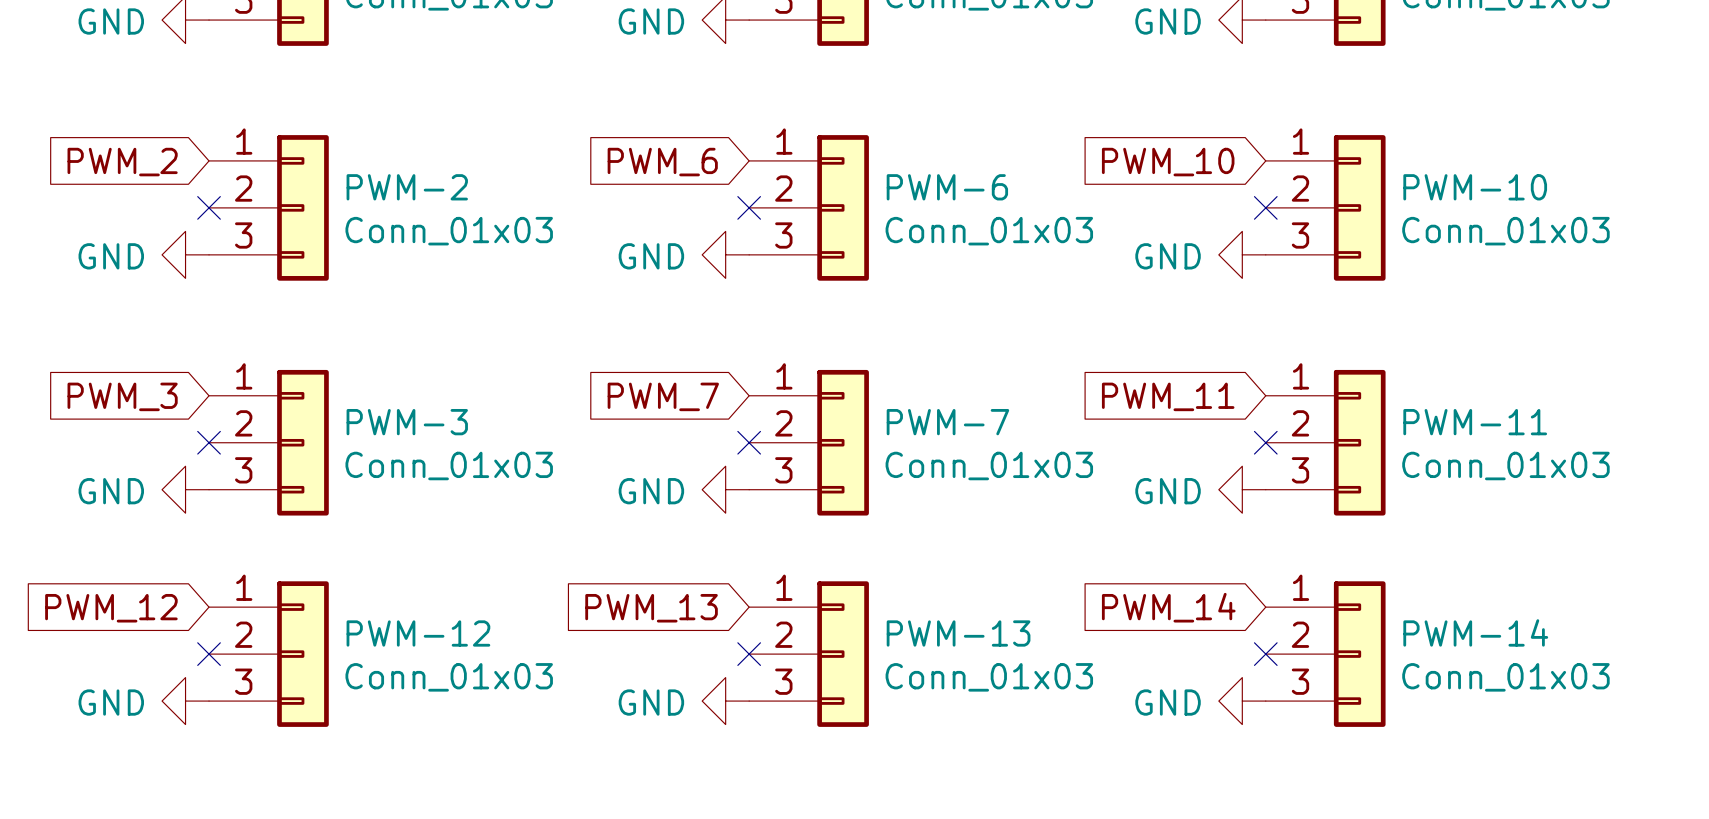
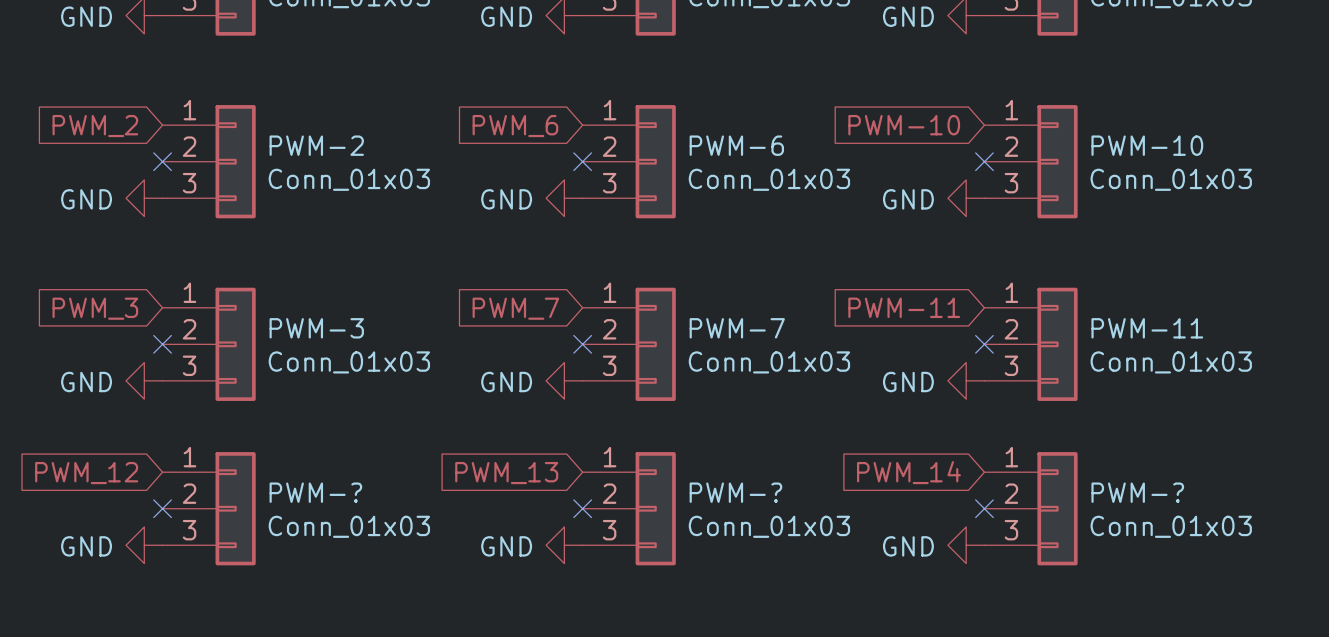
global label: PWM_10 (1168, 162) -> PWM-10 (904, 125)
global label: PWM_11 (1168, 396) -> PWM-11 (904, 307)
PWM-14 name: PWM-14 (1475, 632) -> PWM-? (1137, 492)
PWM-12 name: PWM-12 (418, 633) -> PWM-? (315, 492)
PWM-13 name: PWM-13 (958, 633) -> PWM-? (735, 492)

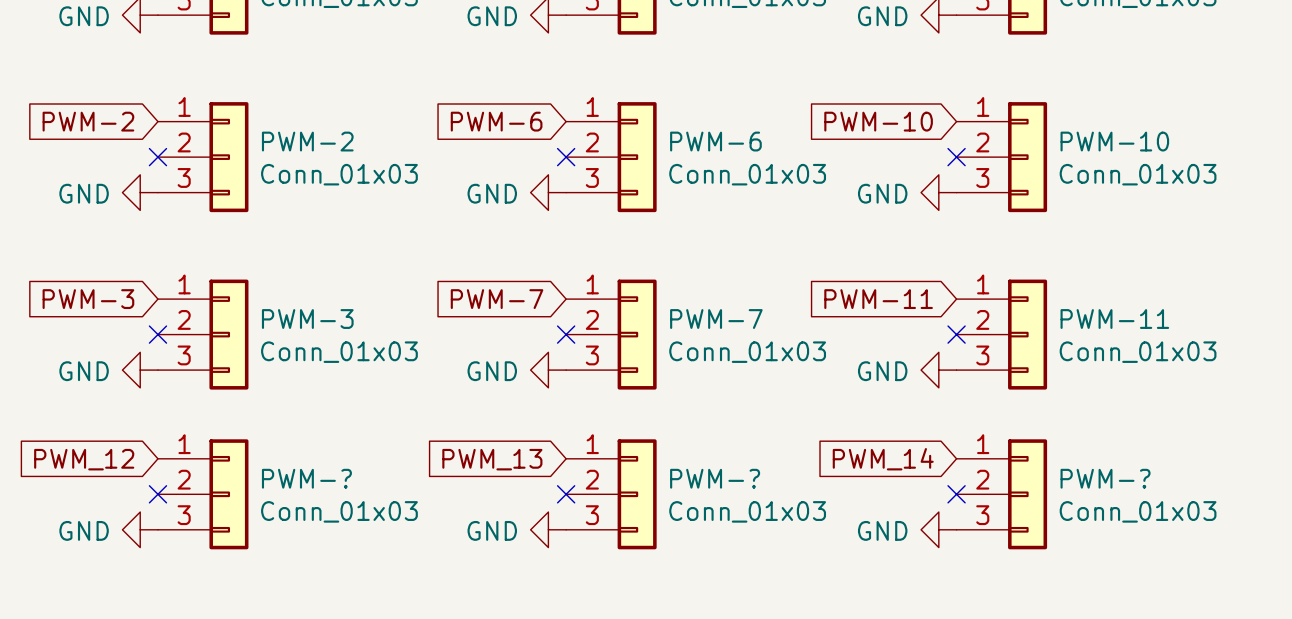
global label: PWM_2 (95, 126) -> PWM-2 (88, 121)
global label: PWM_6 (515, 126) -> PWM-6 (496, 121)
global label: PWM_3 (95, 308) -> PWM-3 (88, 299)
global label: PWM_7 (515, 308) -> PWM-7 (497, 299)

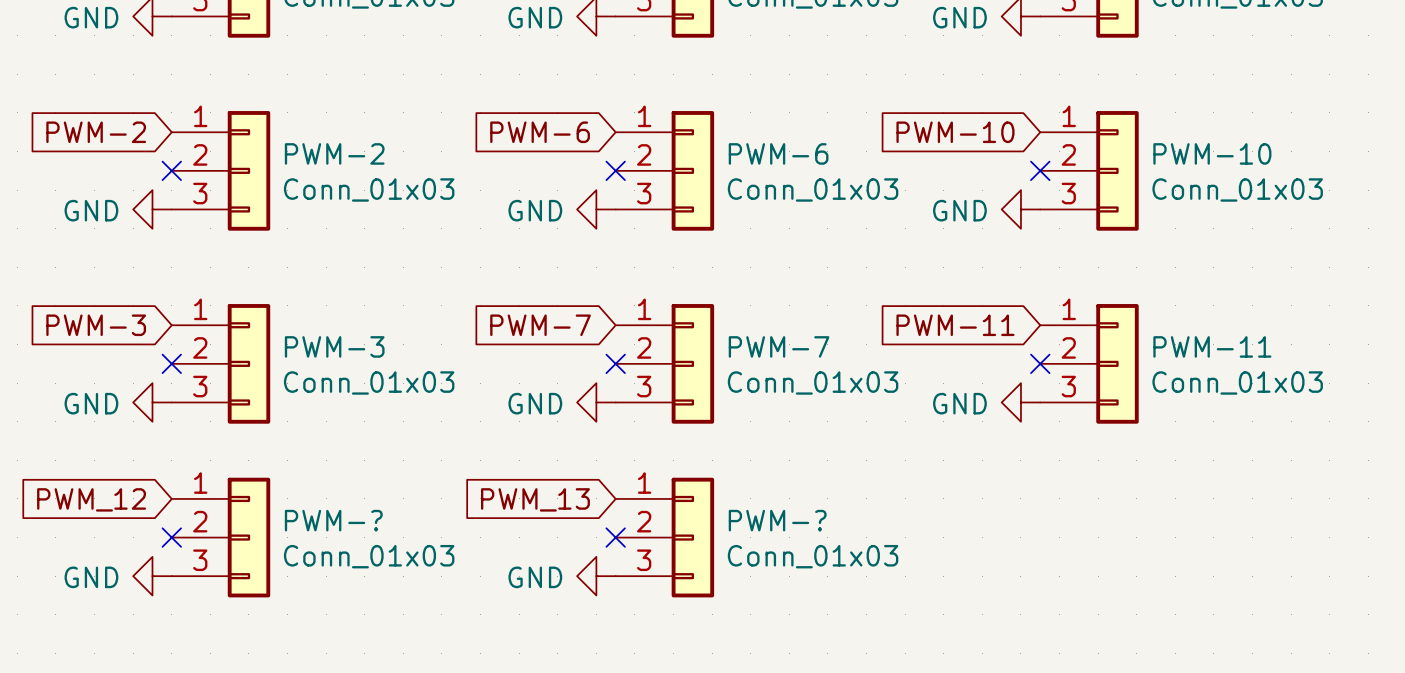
global label: PWM_14 (883, 459) -> none
no-connect mark: (956, 494) -> none
PWM-?: Conn_01x03 (1001, 494) -> none
power symbol: GND (938, 529) -> none

